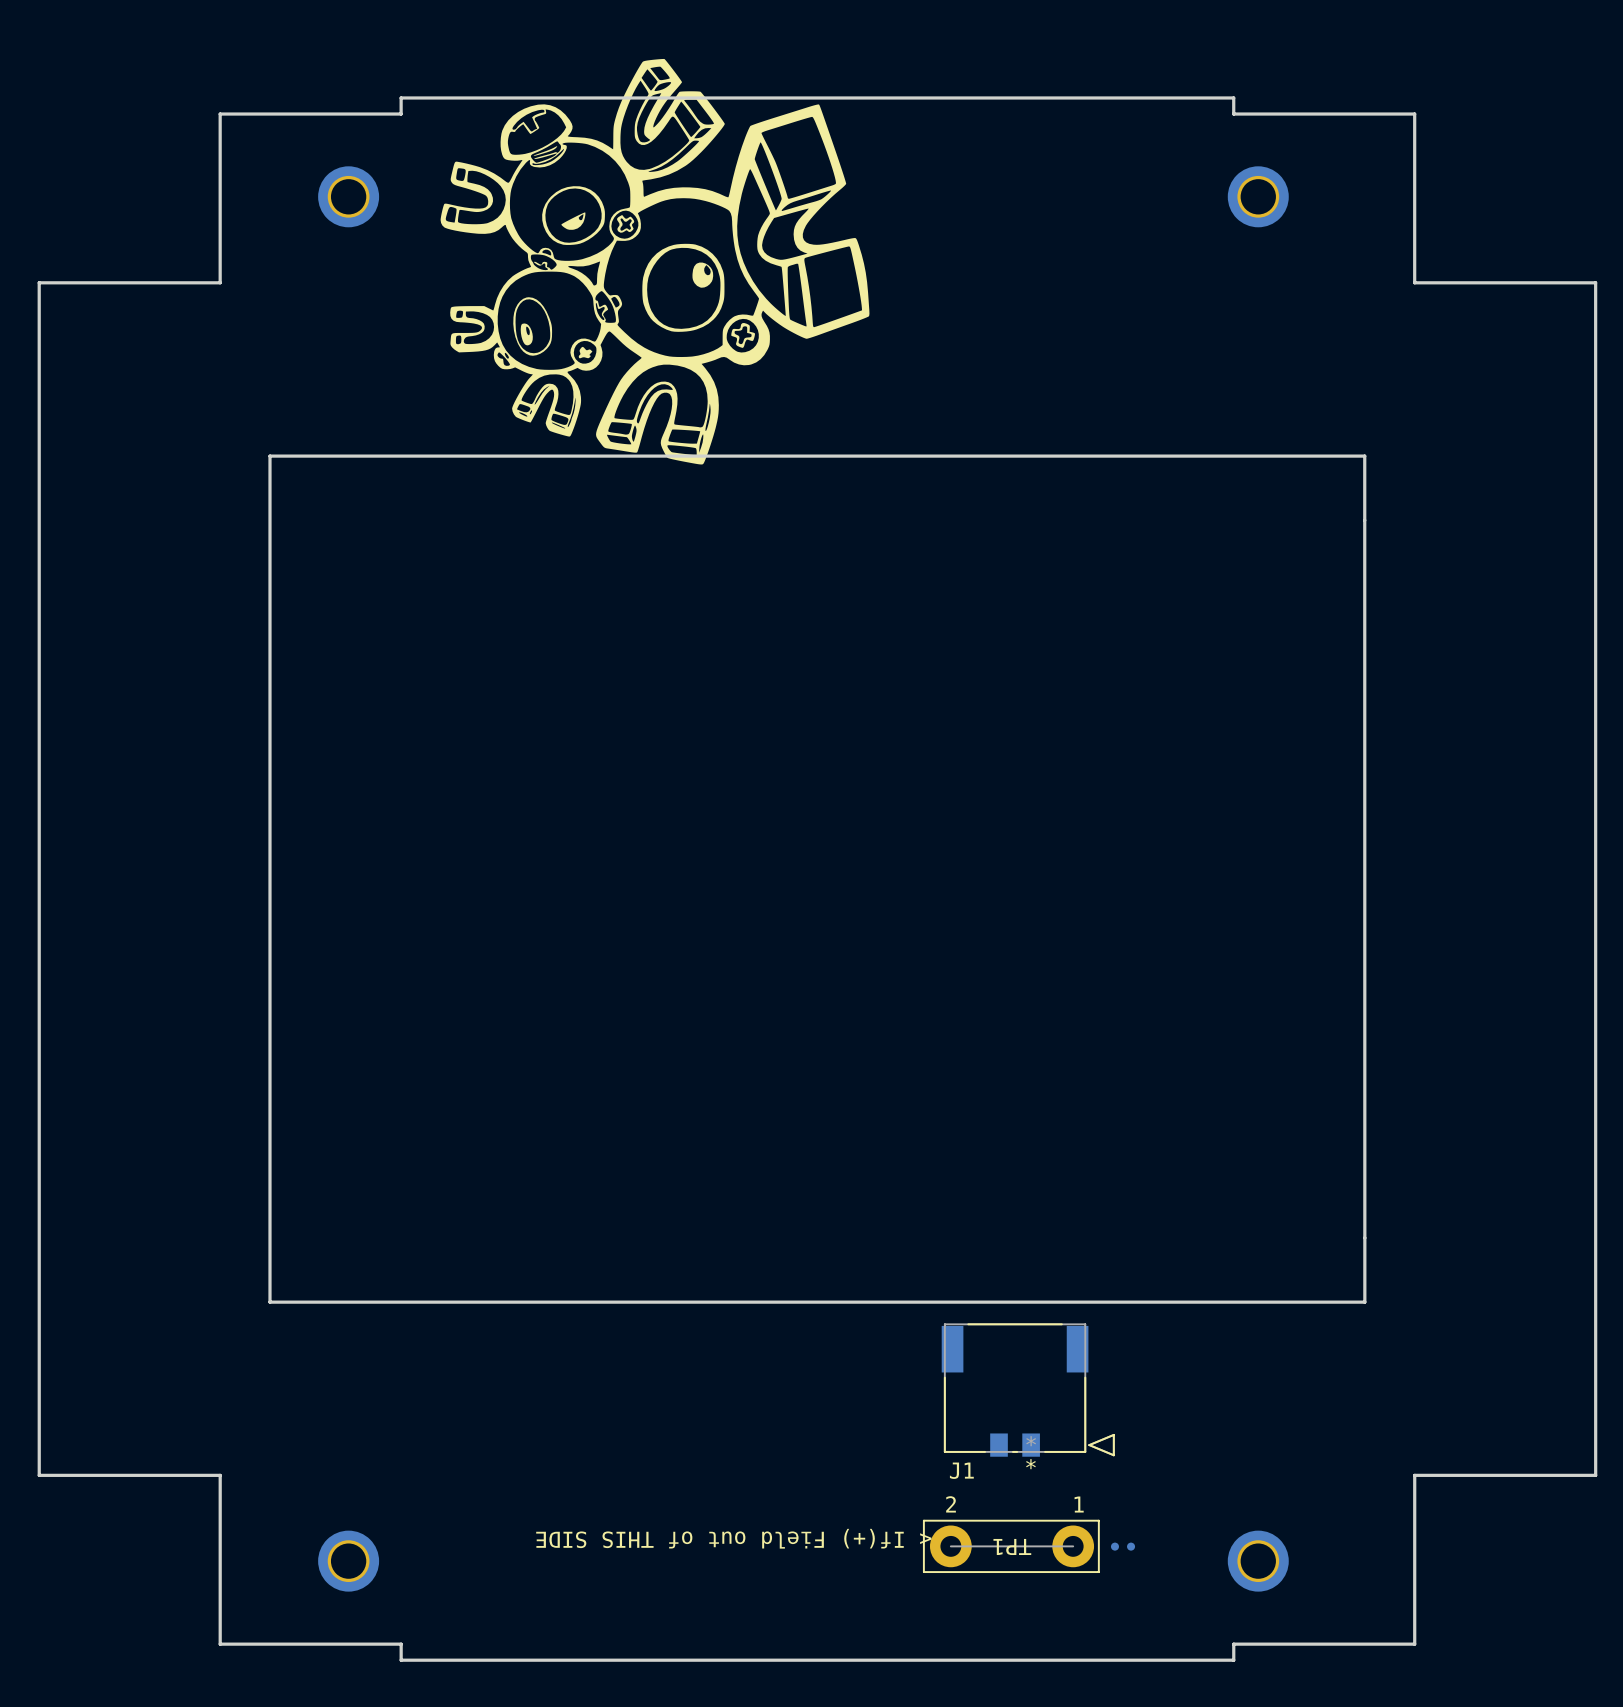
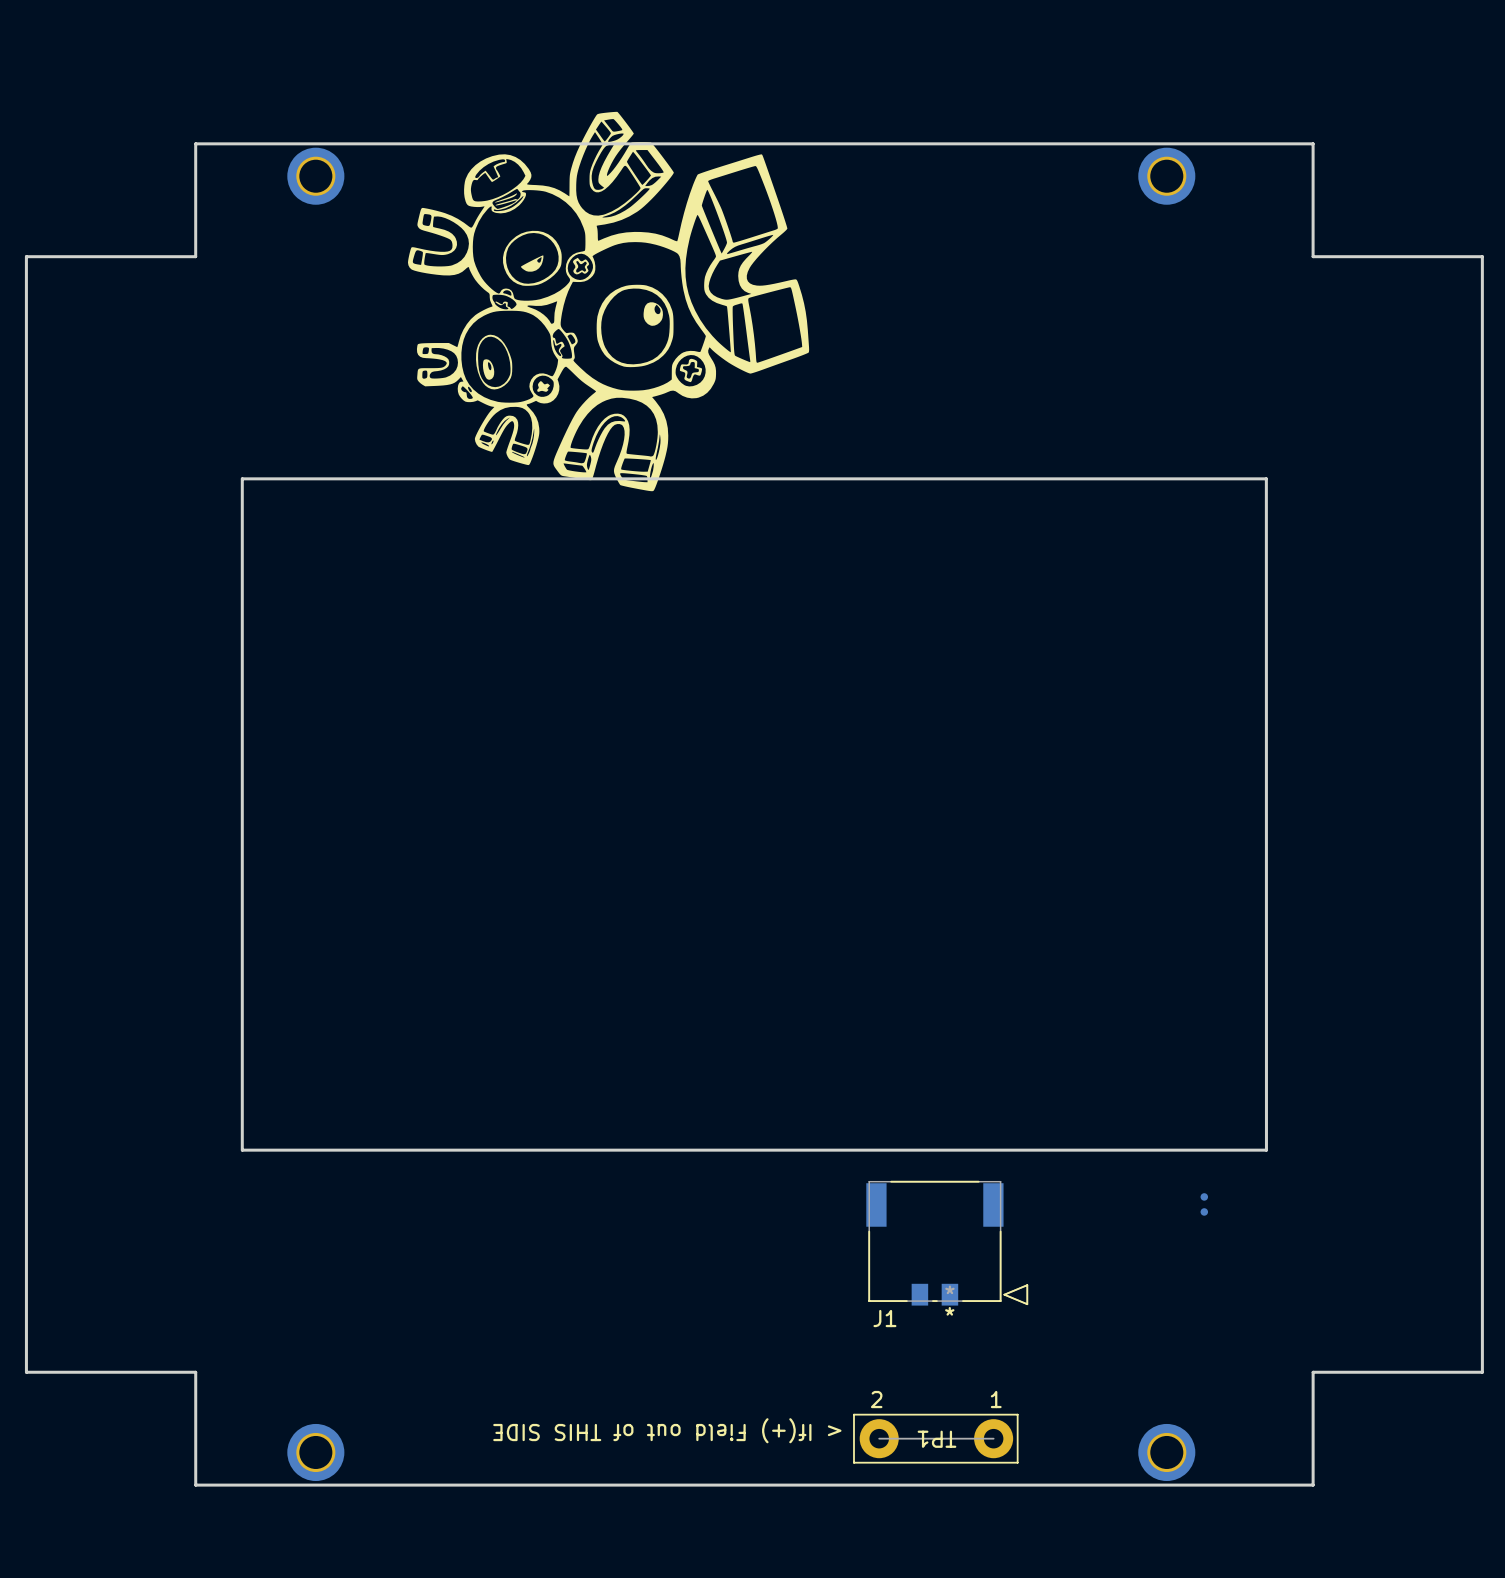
board edge: (1414, 162) (1414, 114) (1233, 114) (1233, 97) (401, 97) (401, 114) (220, 114) (220, 162) -> (1313, 143) (195, 143)
drawing position: (655, 261) -> (608, 301)
board edge: (1364, 520) (1364, 456) (269, 456) (269, 520) -> (1266, 478) (242, 478)
board edge: (1364, 1237) (1364, 1302) (269, 1302) (269, 1237) -> (1266, 1150) (242, 1150)
J1 position: (1028, 1390) -> (947, 1243)
part rotation: 0° (1123, 1546) -> 90° clockwise (1204, 1204)
part position: (1123, 1546) -> (1204, 1204)
board edge: (1414, 1595) (1414, 1644) (1233, 1644) (1233, 1660) (401, 1660) (401, 1644) (220, 1644) (220, 1595) -> (1313, 1485) (195, 1485)

